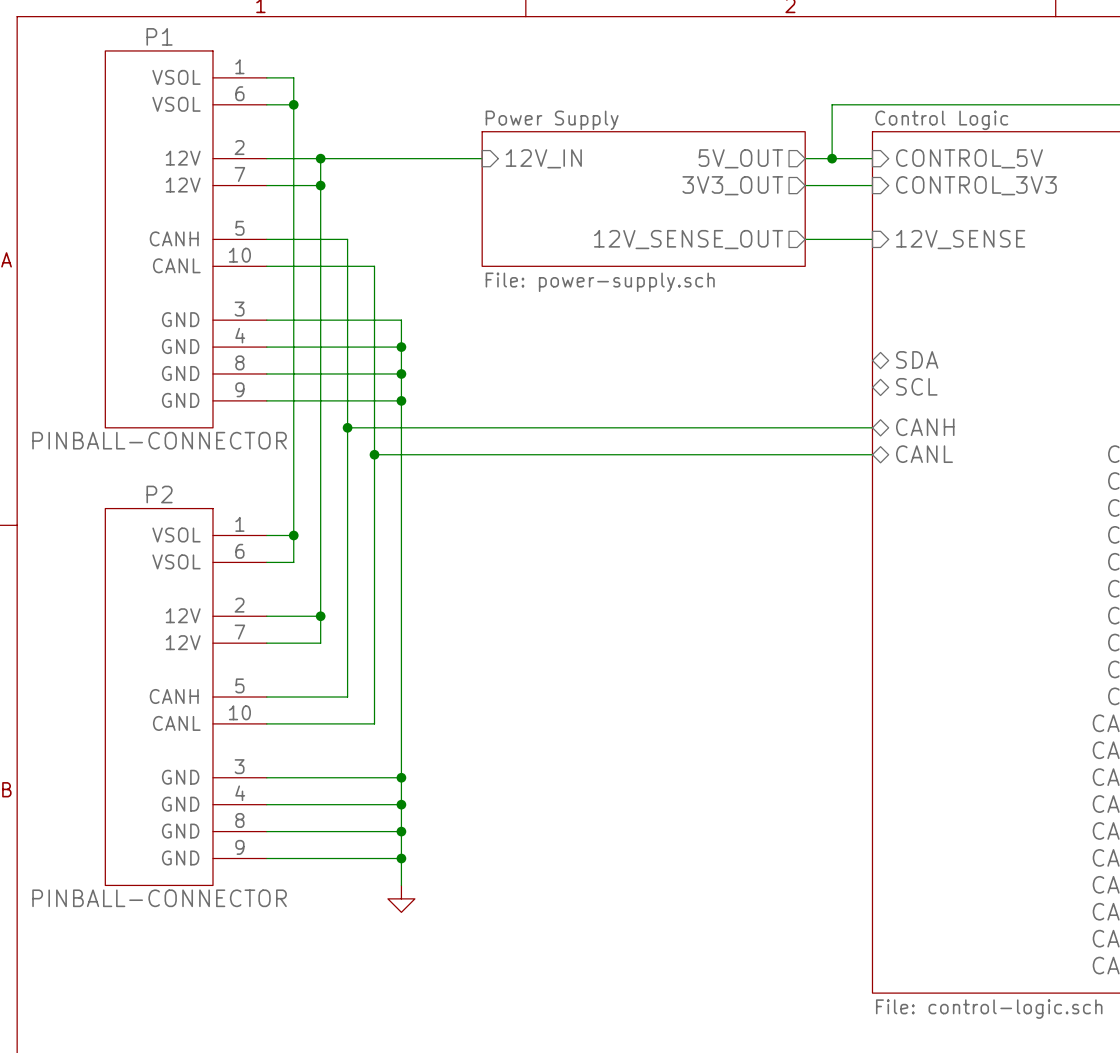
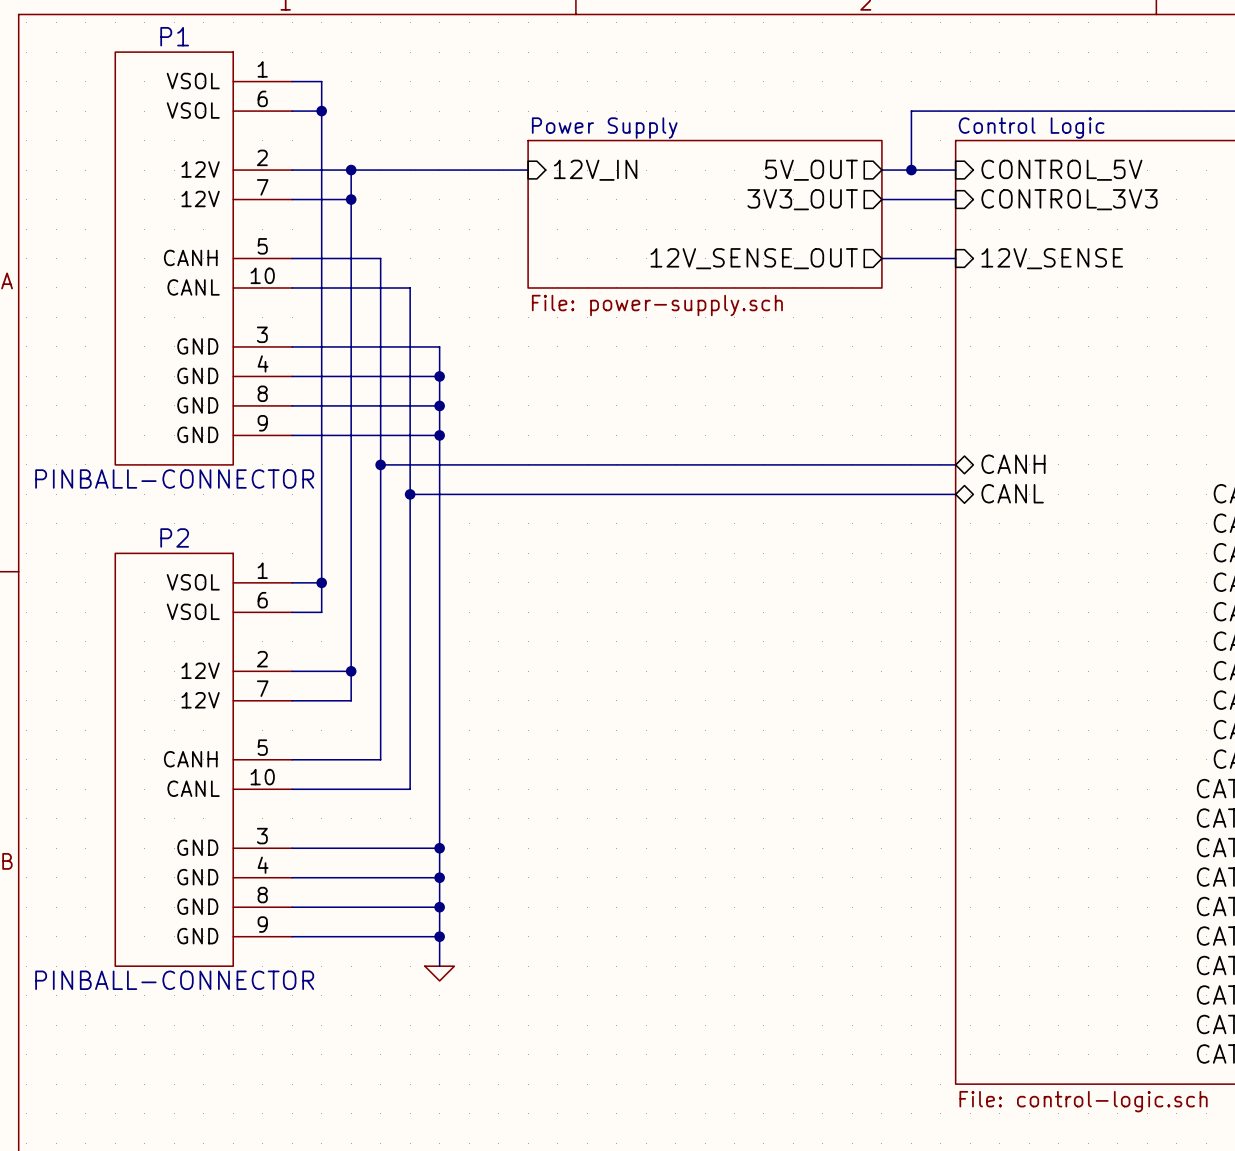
sheet pin: SDA (917, 359) -> none
sheet pin: SCL (916, 386) -> none
power symbol shape: [387, 885, 415, 913] -> [424, 966, 455, 981]

